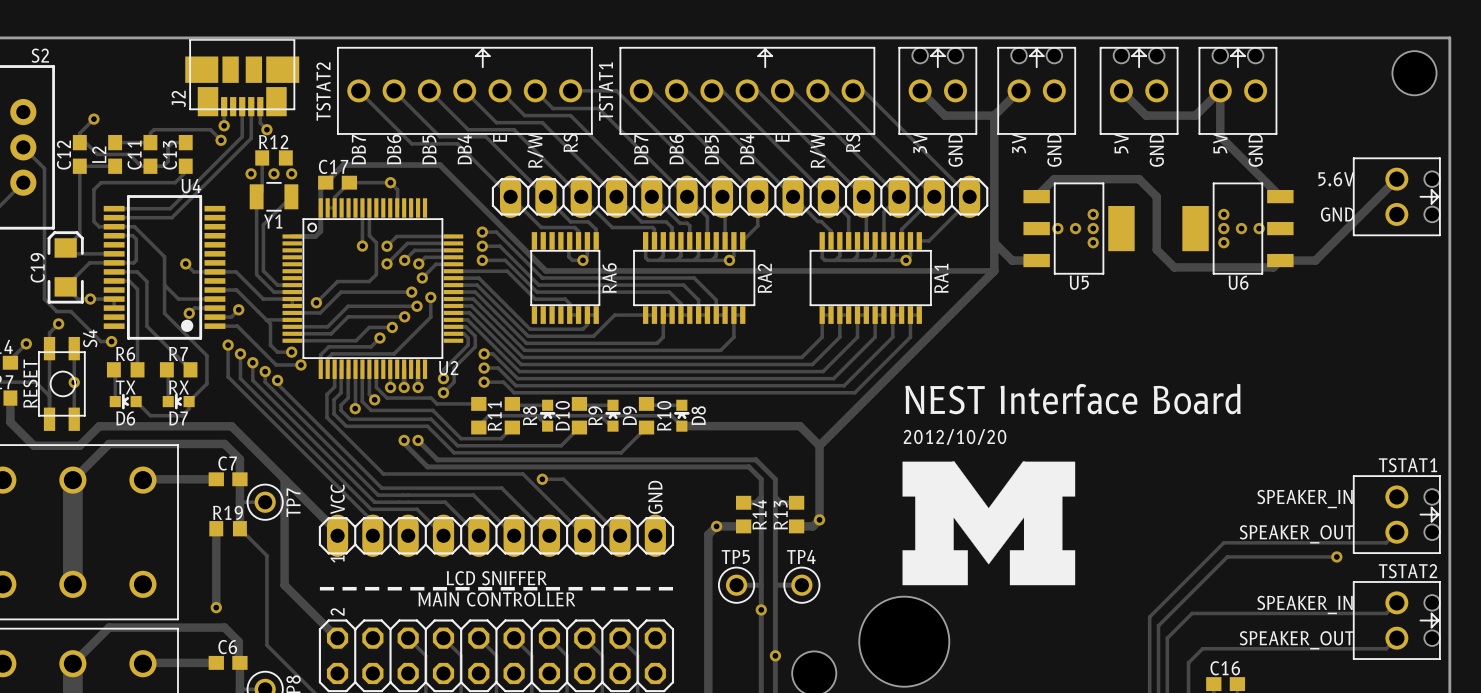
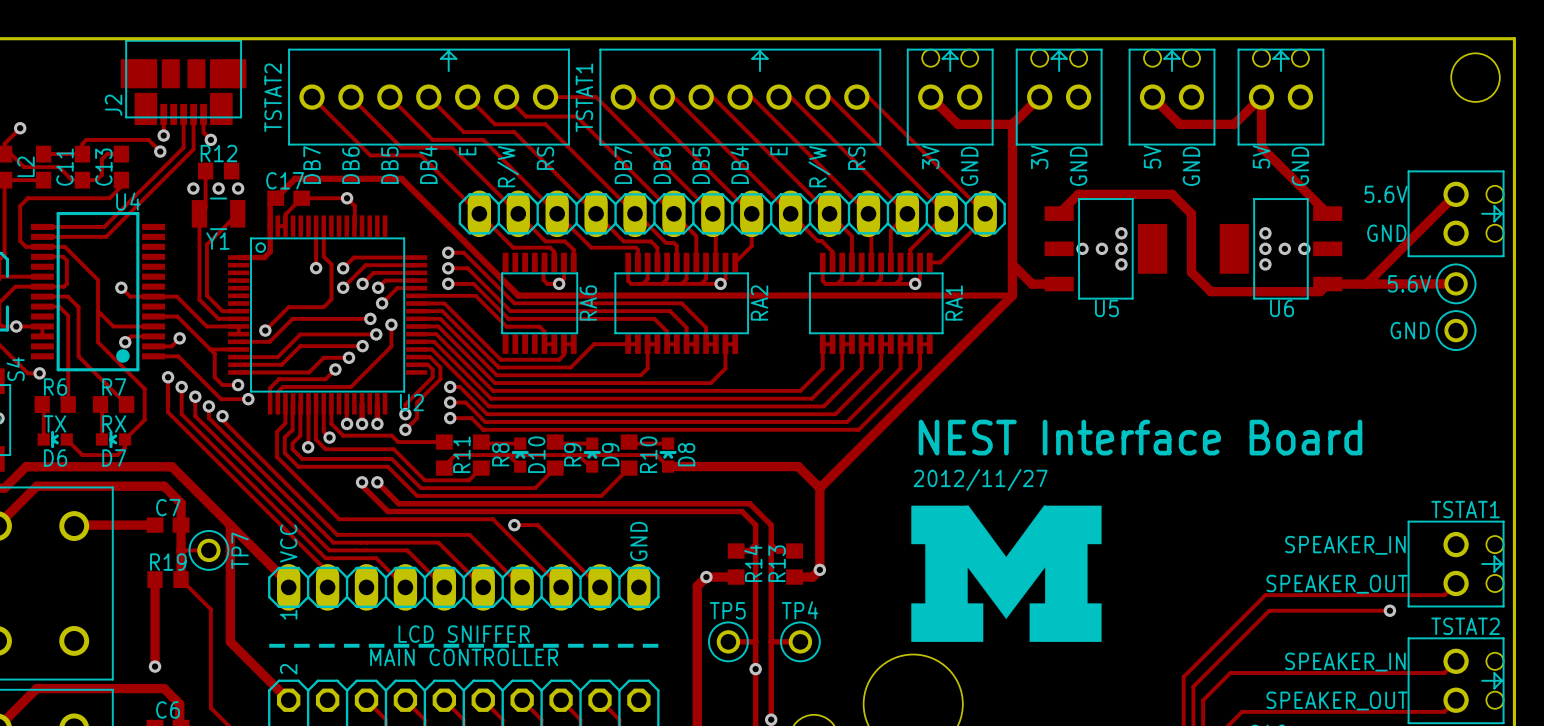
text: none -> 5.6V (1409, 283)
track: none -> (1456, 283) (1366, 284)
part: none -> (1456, 283)
text: none -> GND (1410, 330)
part: none -> (1456, 330)
text: 2012/10/20 (955, 436) -> 2012/11/27 (980, 479)

